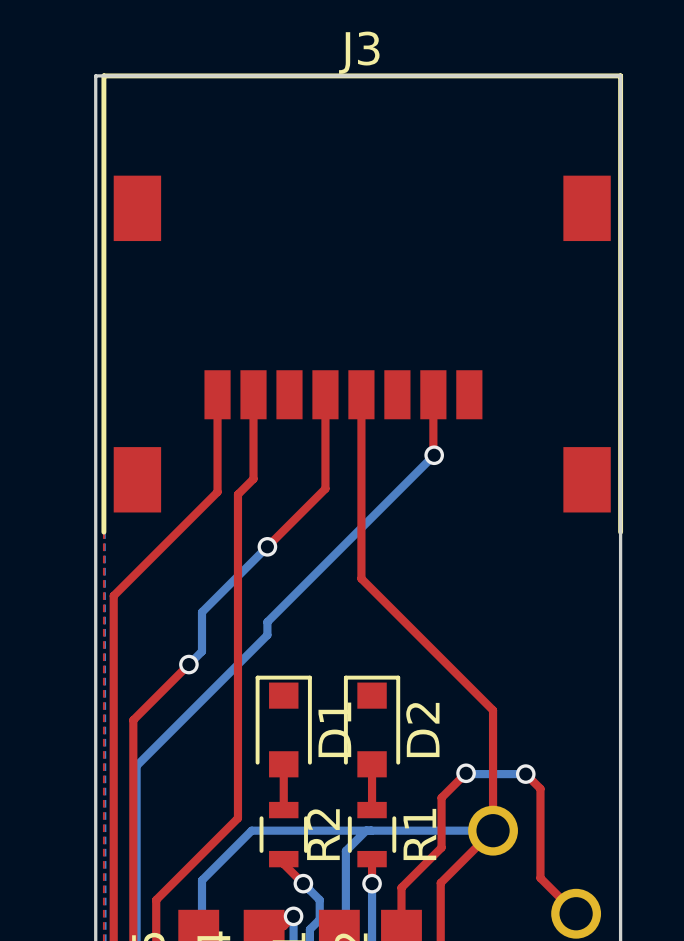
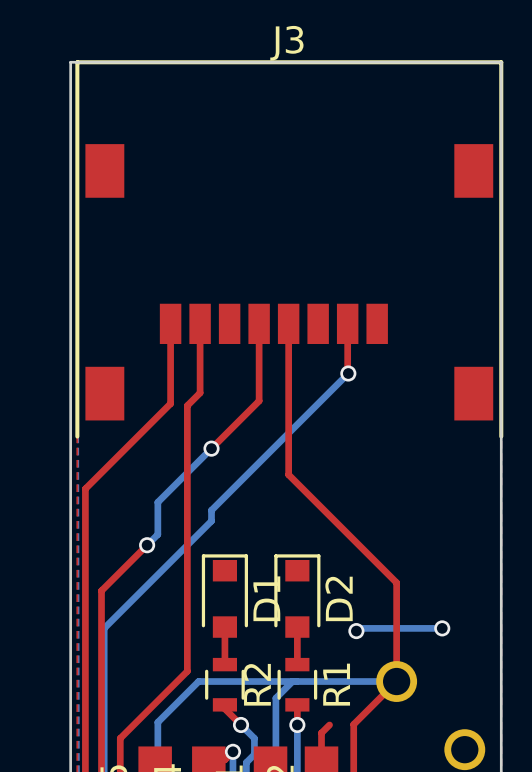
bottom track: none -> (442, 628) (359, 628) (356, 631)
bottom track: (466, 773) (525, 774) -> none
top track: (466, 773) (441, 797) (441, 847) (401, 887) (401, 893) -> (329, 724) (321, 733)
via position: (466, 773) -> (356, 631)
top track: (525, 774) (540, 788) (540, 878) (576, 913) -> none
via position: (525, 774) -> (442, 628)

